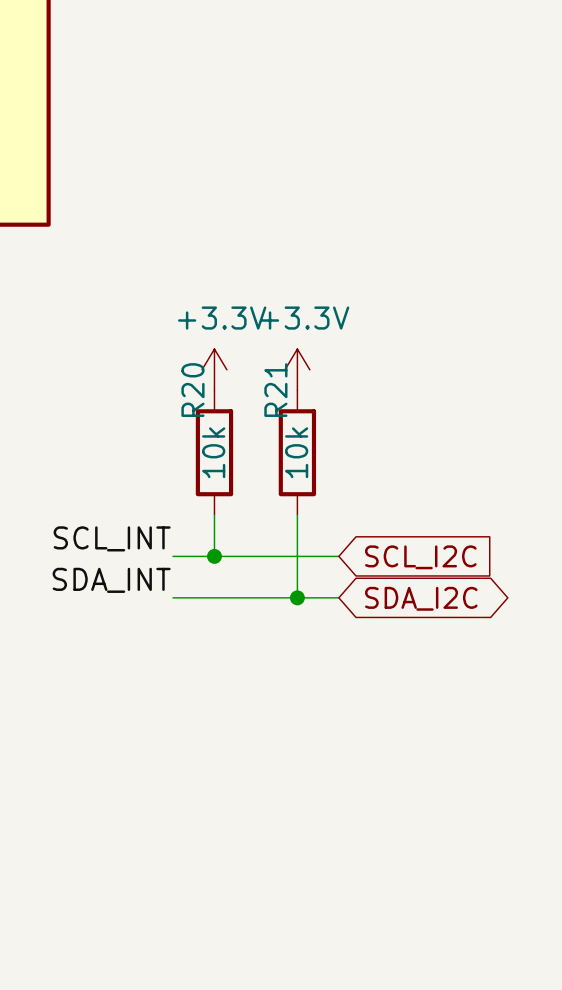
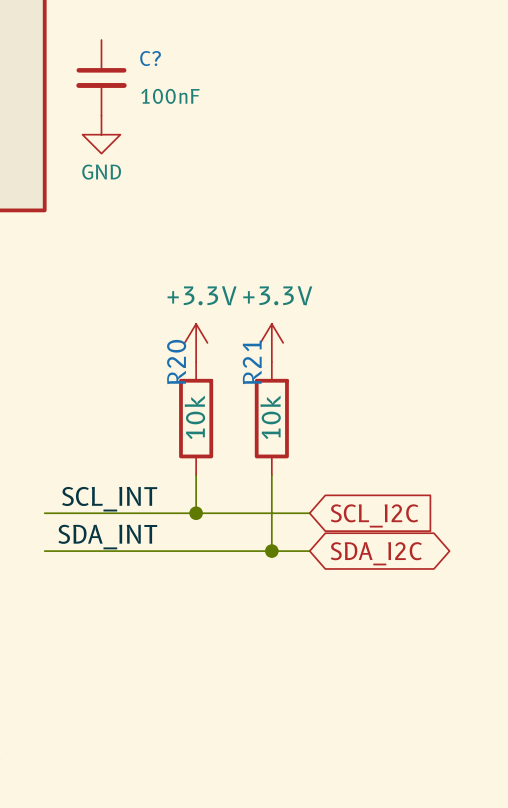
C?: none -> 100nF (101, 77)
power symbol: none -> GND (101, 134)
wire: none -> (44, 513) (158, 513)
wire: none -> (44, 551) (158, 551)

